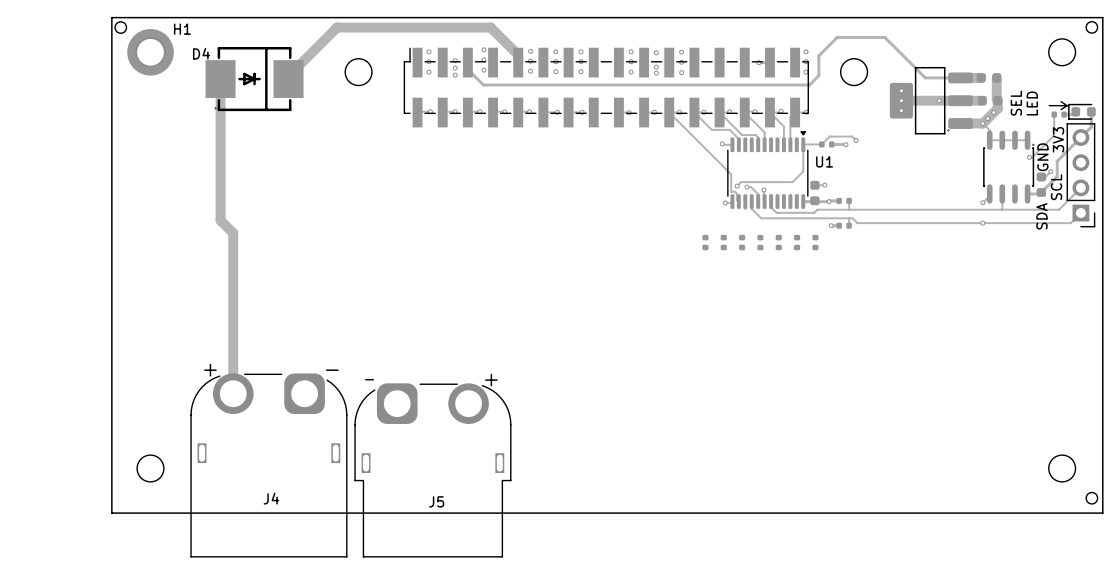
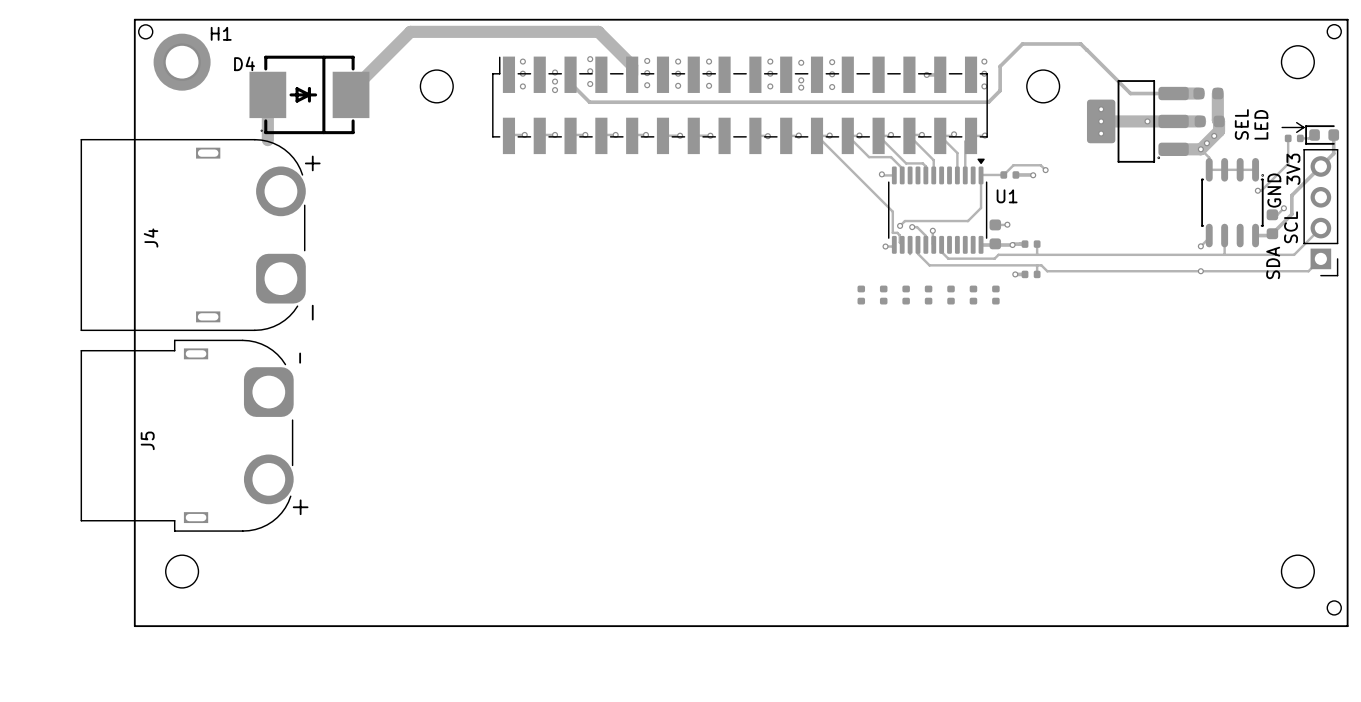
track: (220, 116) (220, 220) (233, 233) (233, 393) -> none
J4 rotation: 0° (268, 465) -> 90° clockwise (193, 235)
J4 position: (268, 465) -> (193, 235)
J5 rotation: 0° (432, 470) -> 90° clockwise (187, 435)
J5 position: (432, 470) -> (187, 435)

